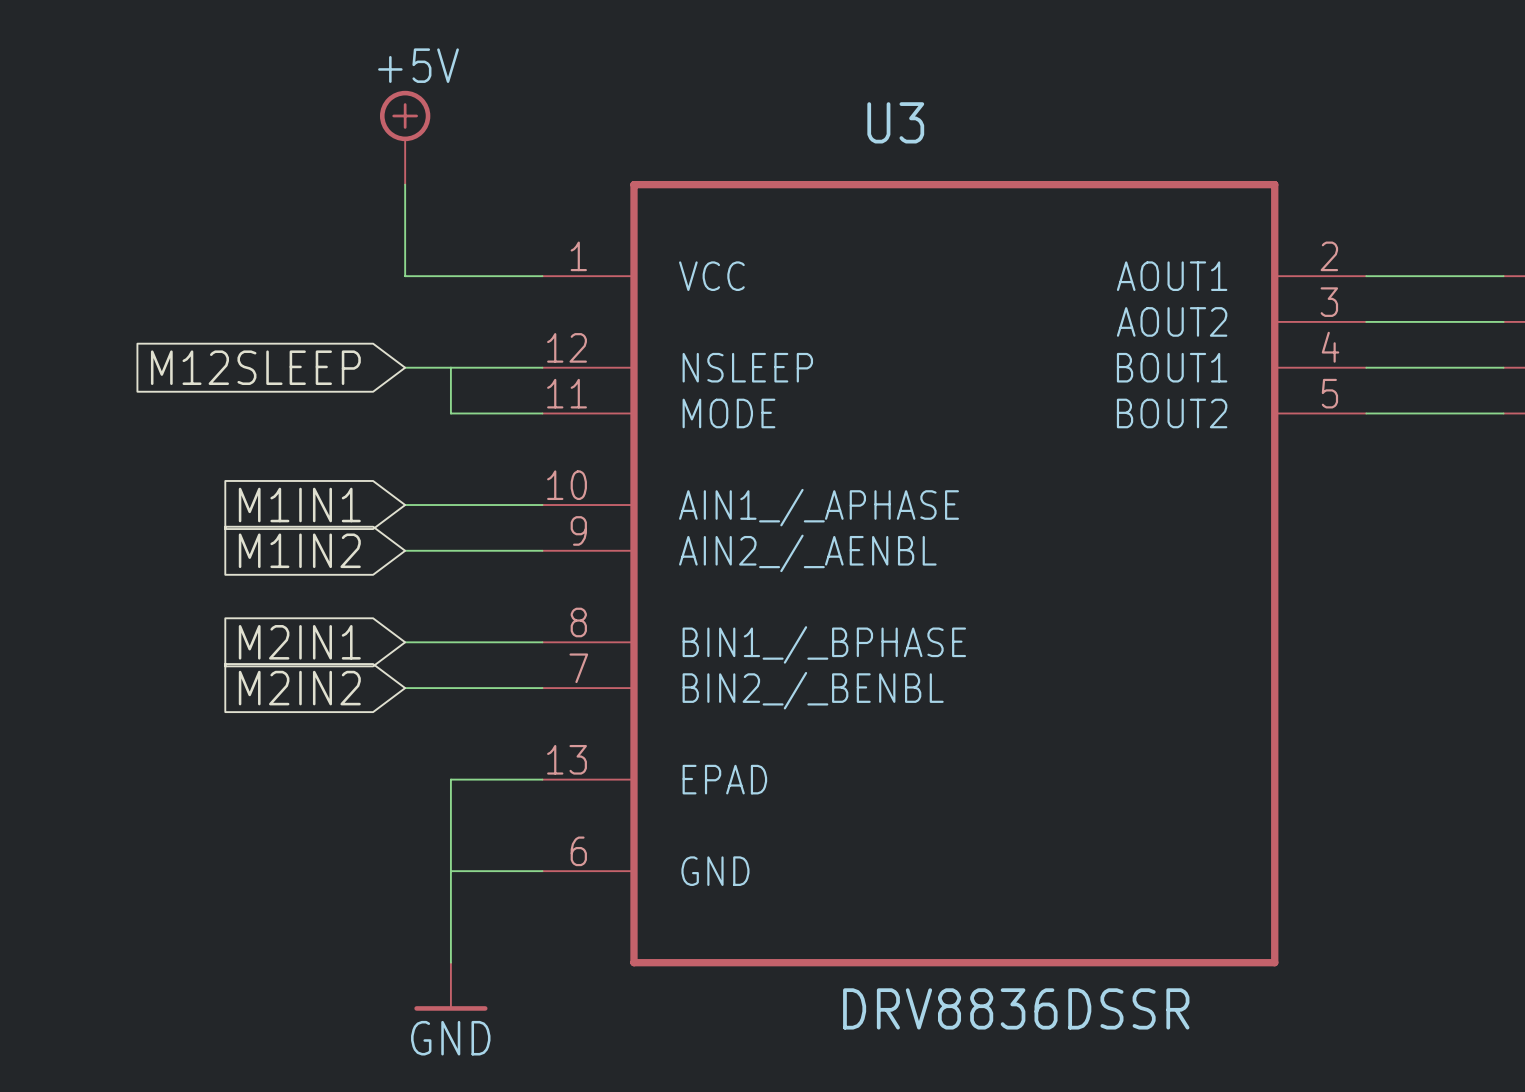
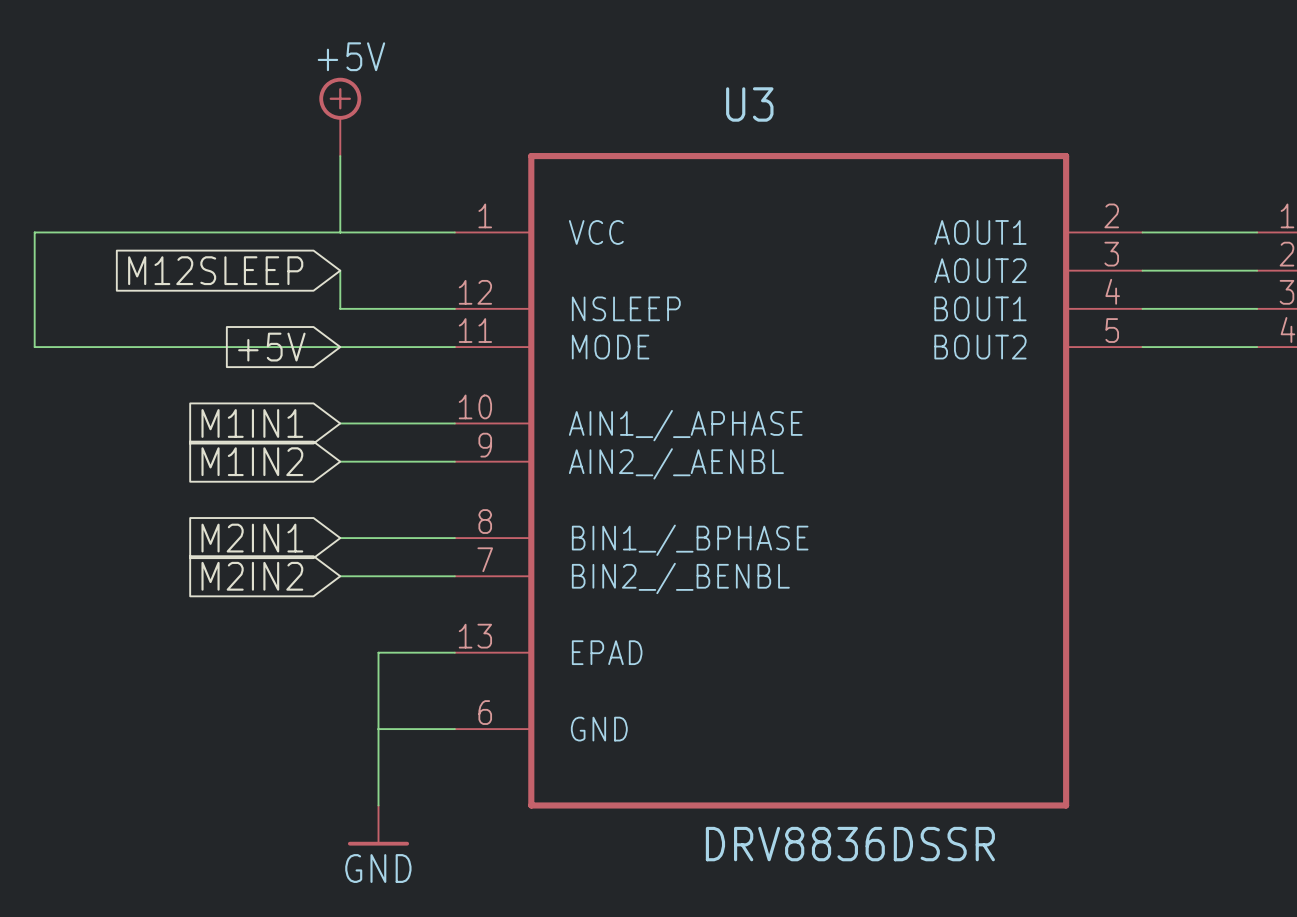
wire: none -> (340, 270) (340, 308)
global label position: M12SLEEP (255, 367) -> M12SLEEP (215, 270)
wire: (450, 367) (450, 413) -> (340, 232) (34, 232) (34, 347) (378, 347)
global label: none -> +5V (271, 347)

